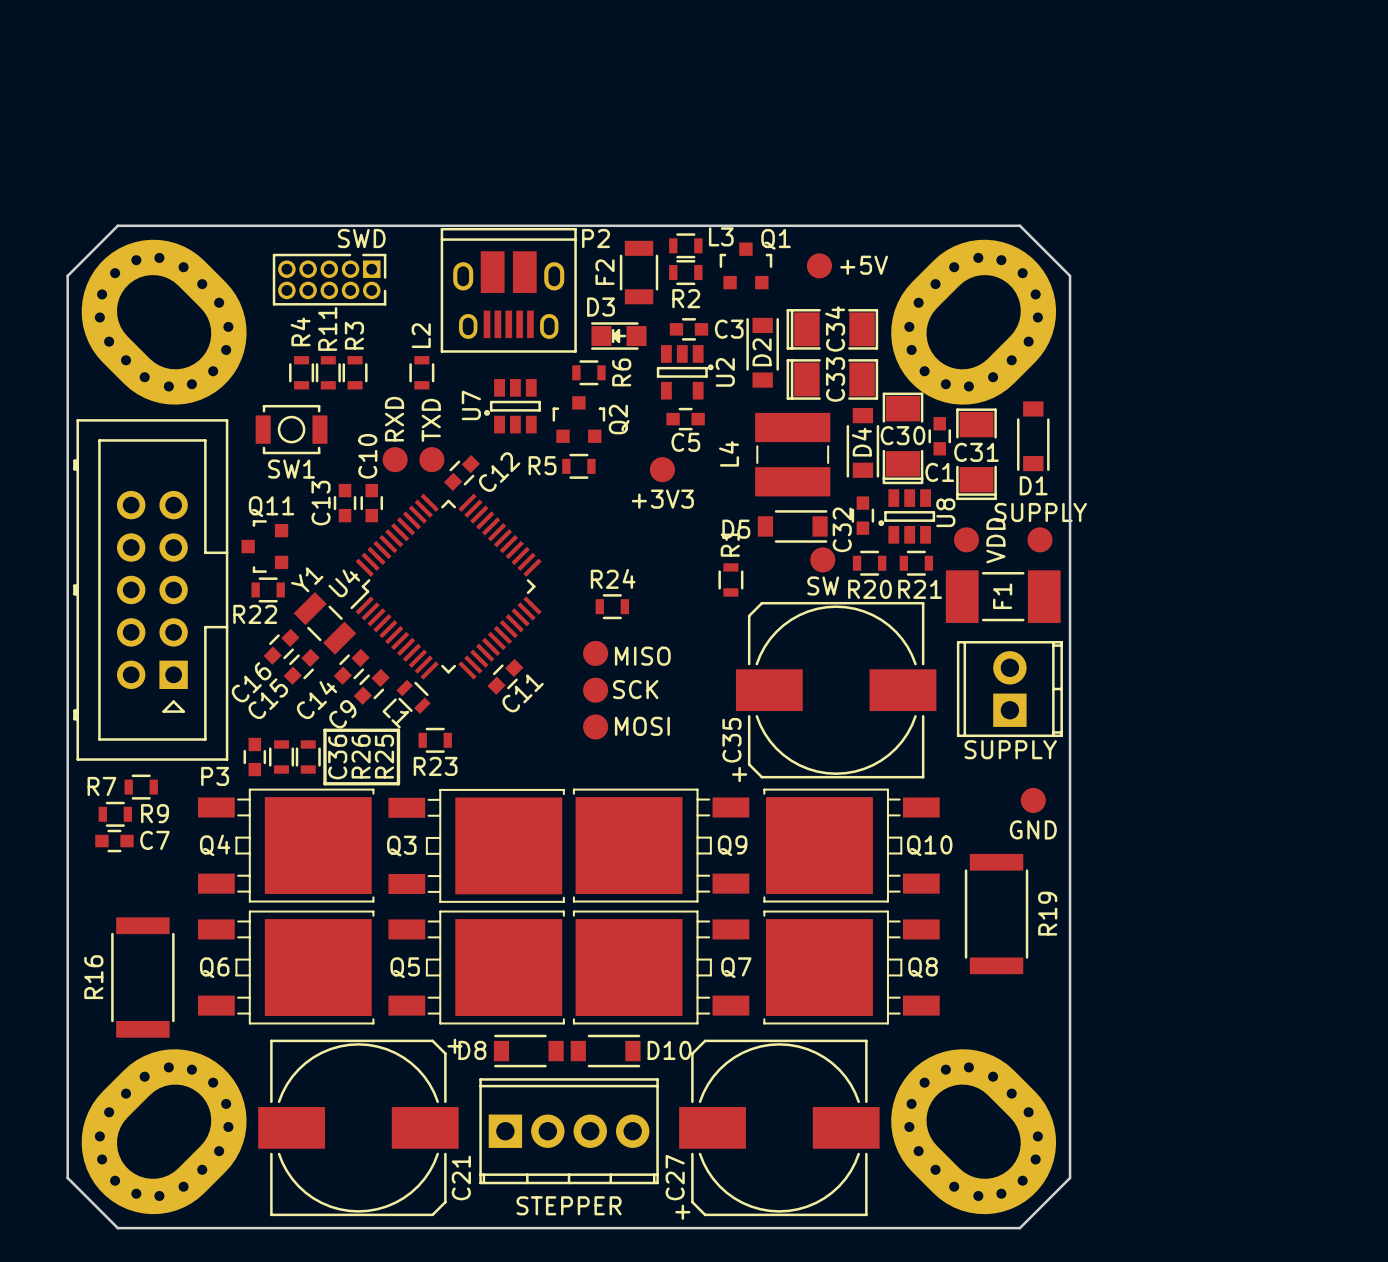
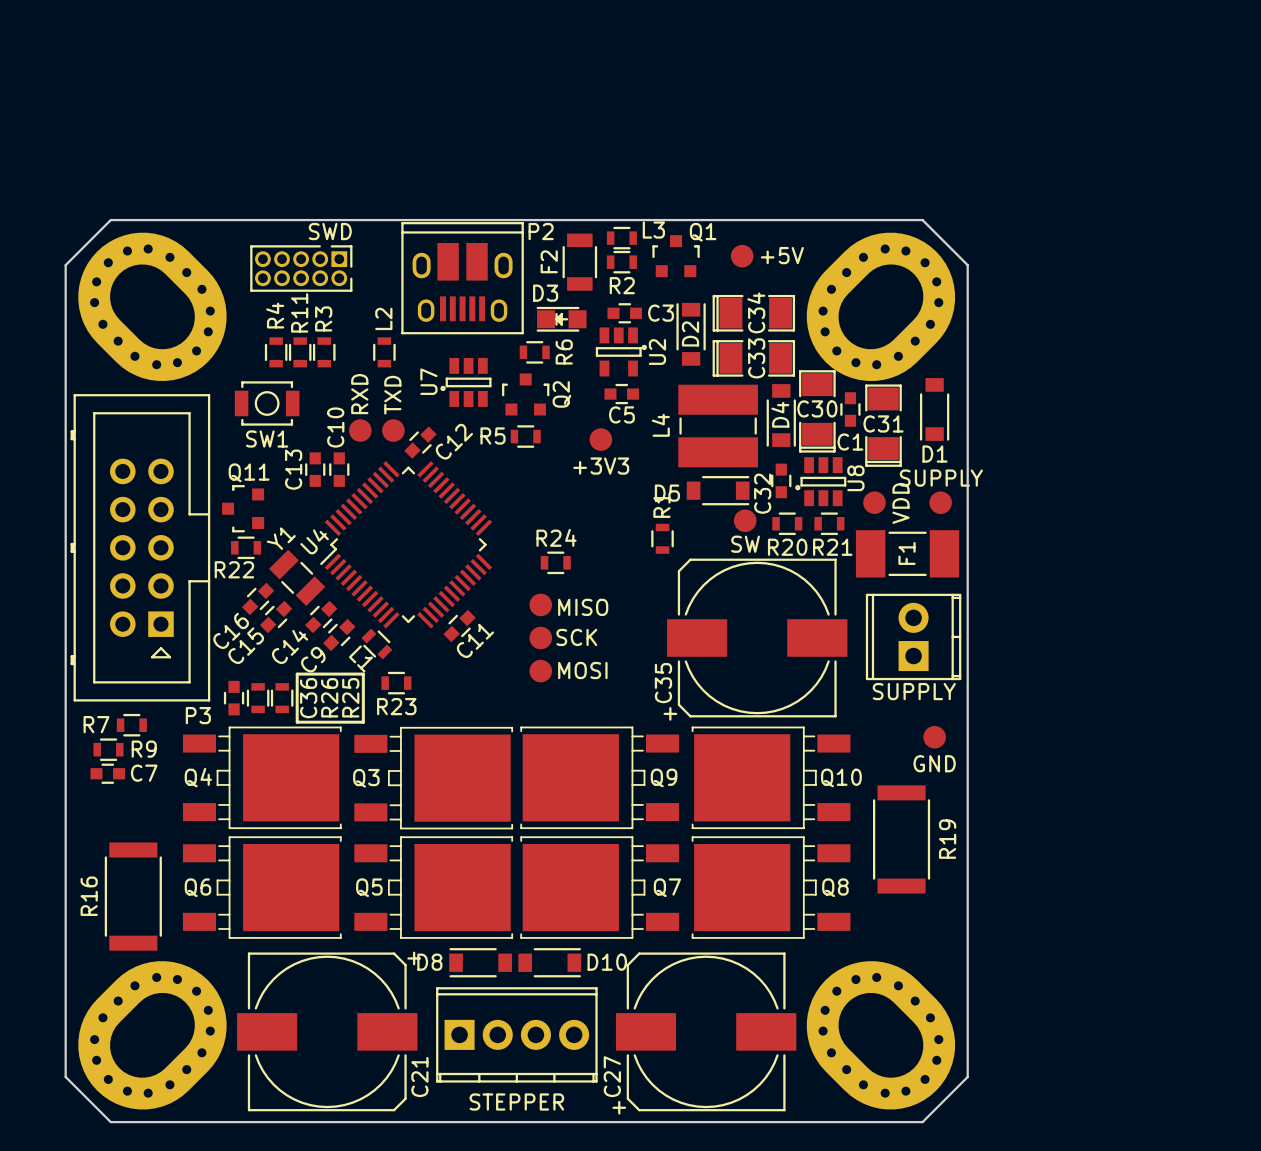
L4 footprint: [755, 412, 831, 497] -> [678, 384, 758, 468]

